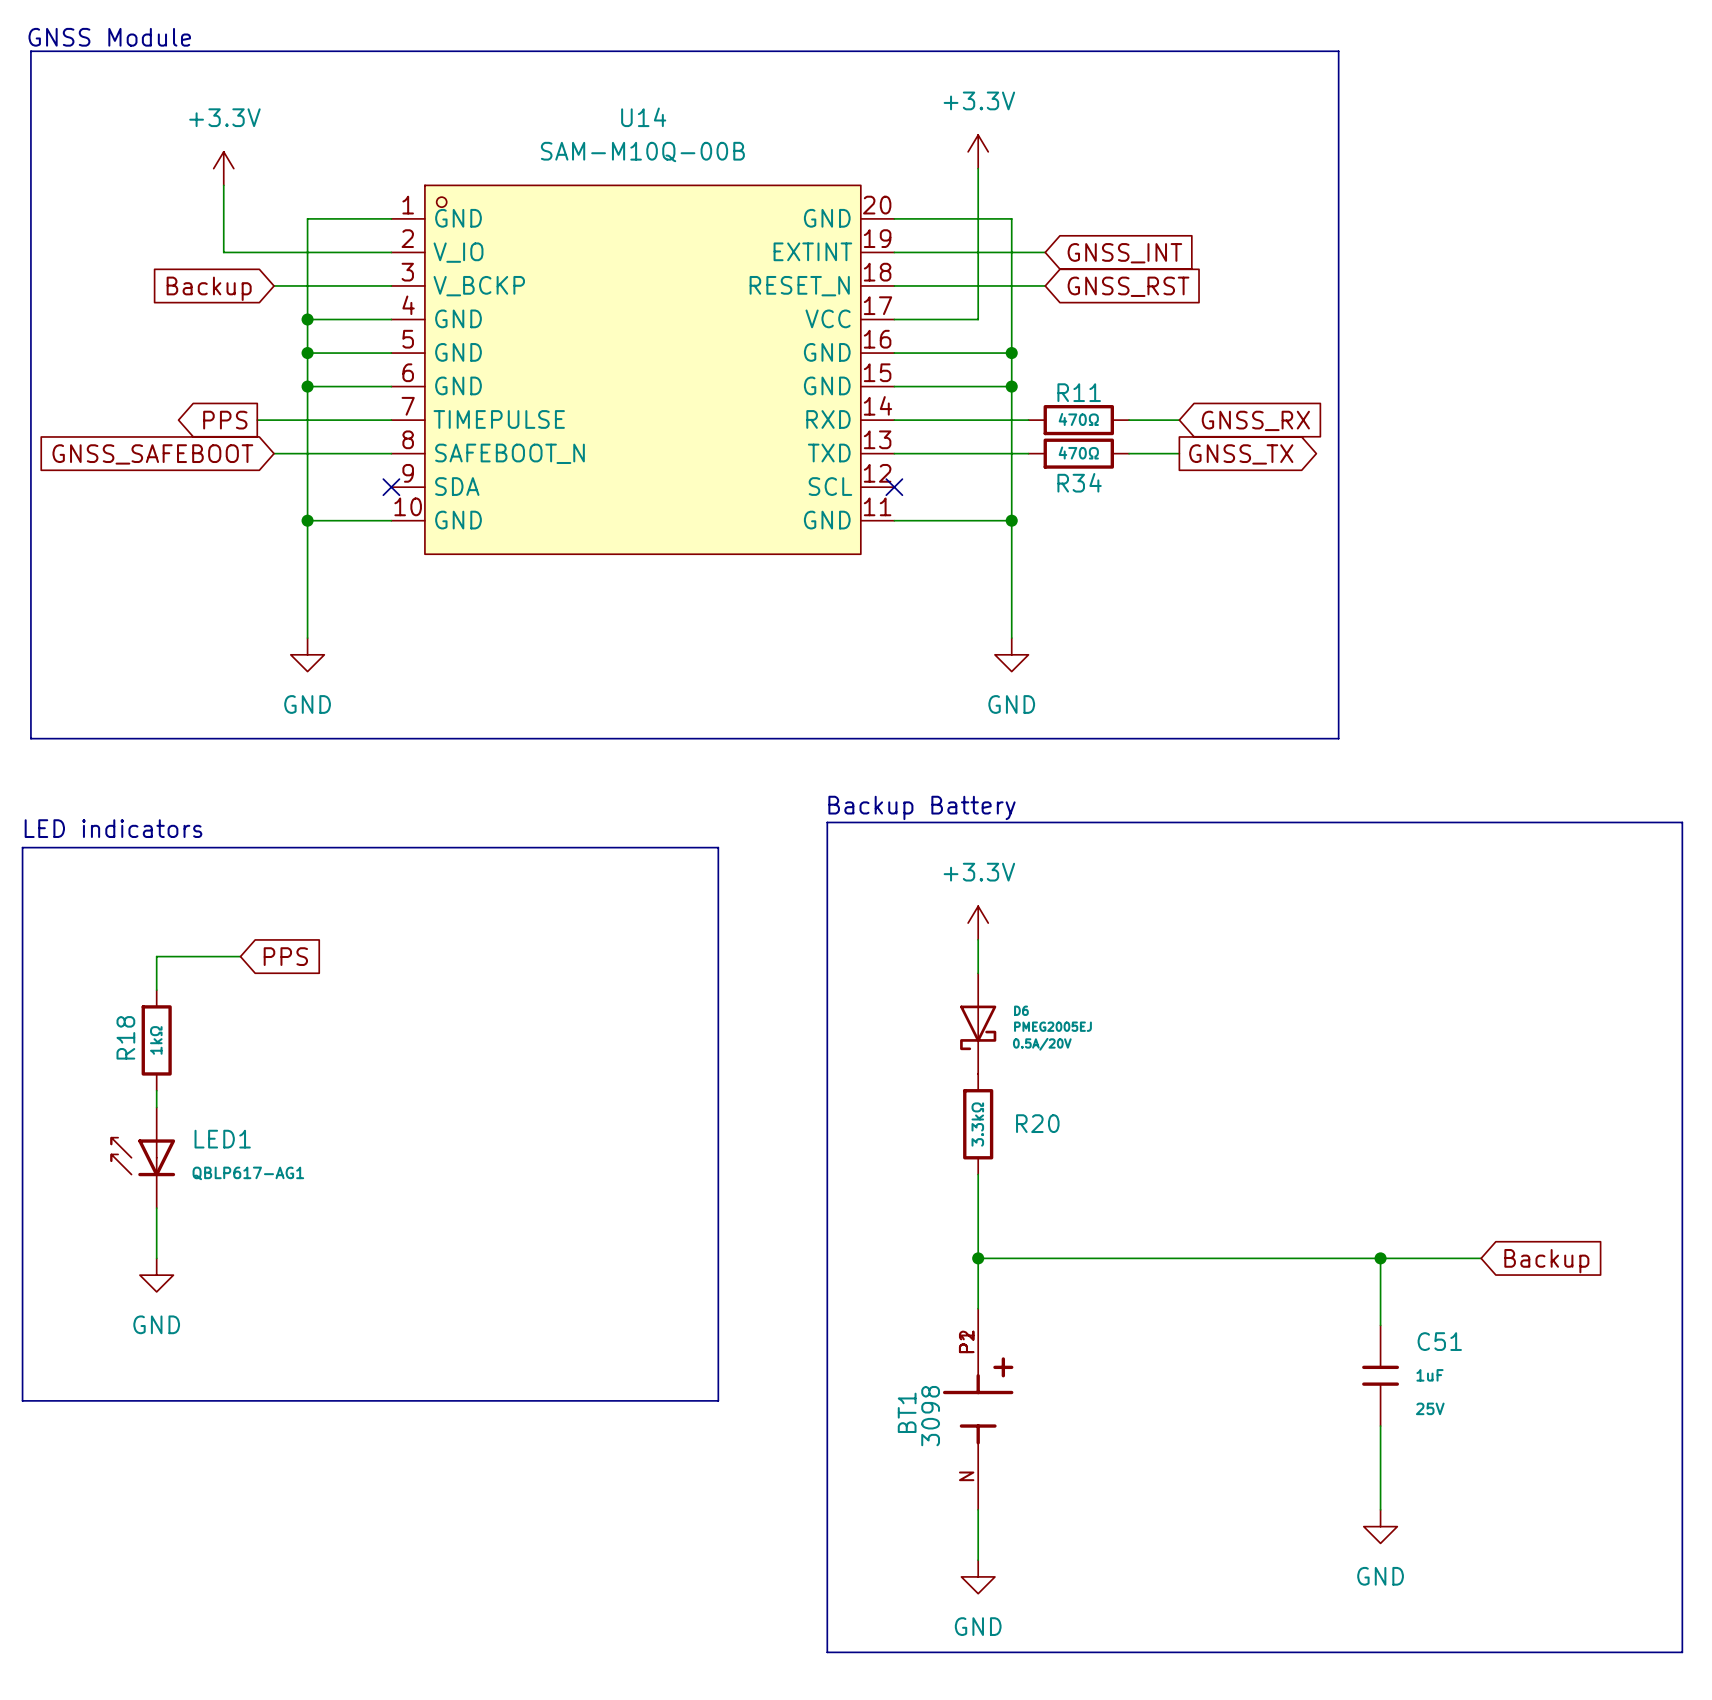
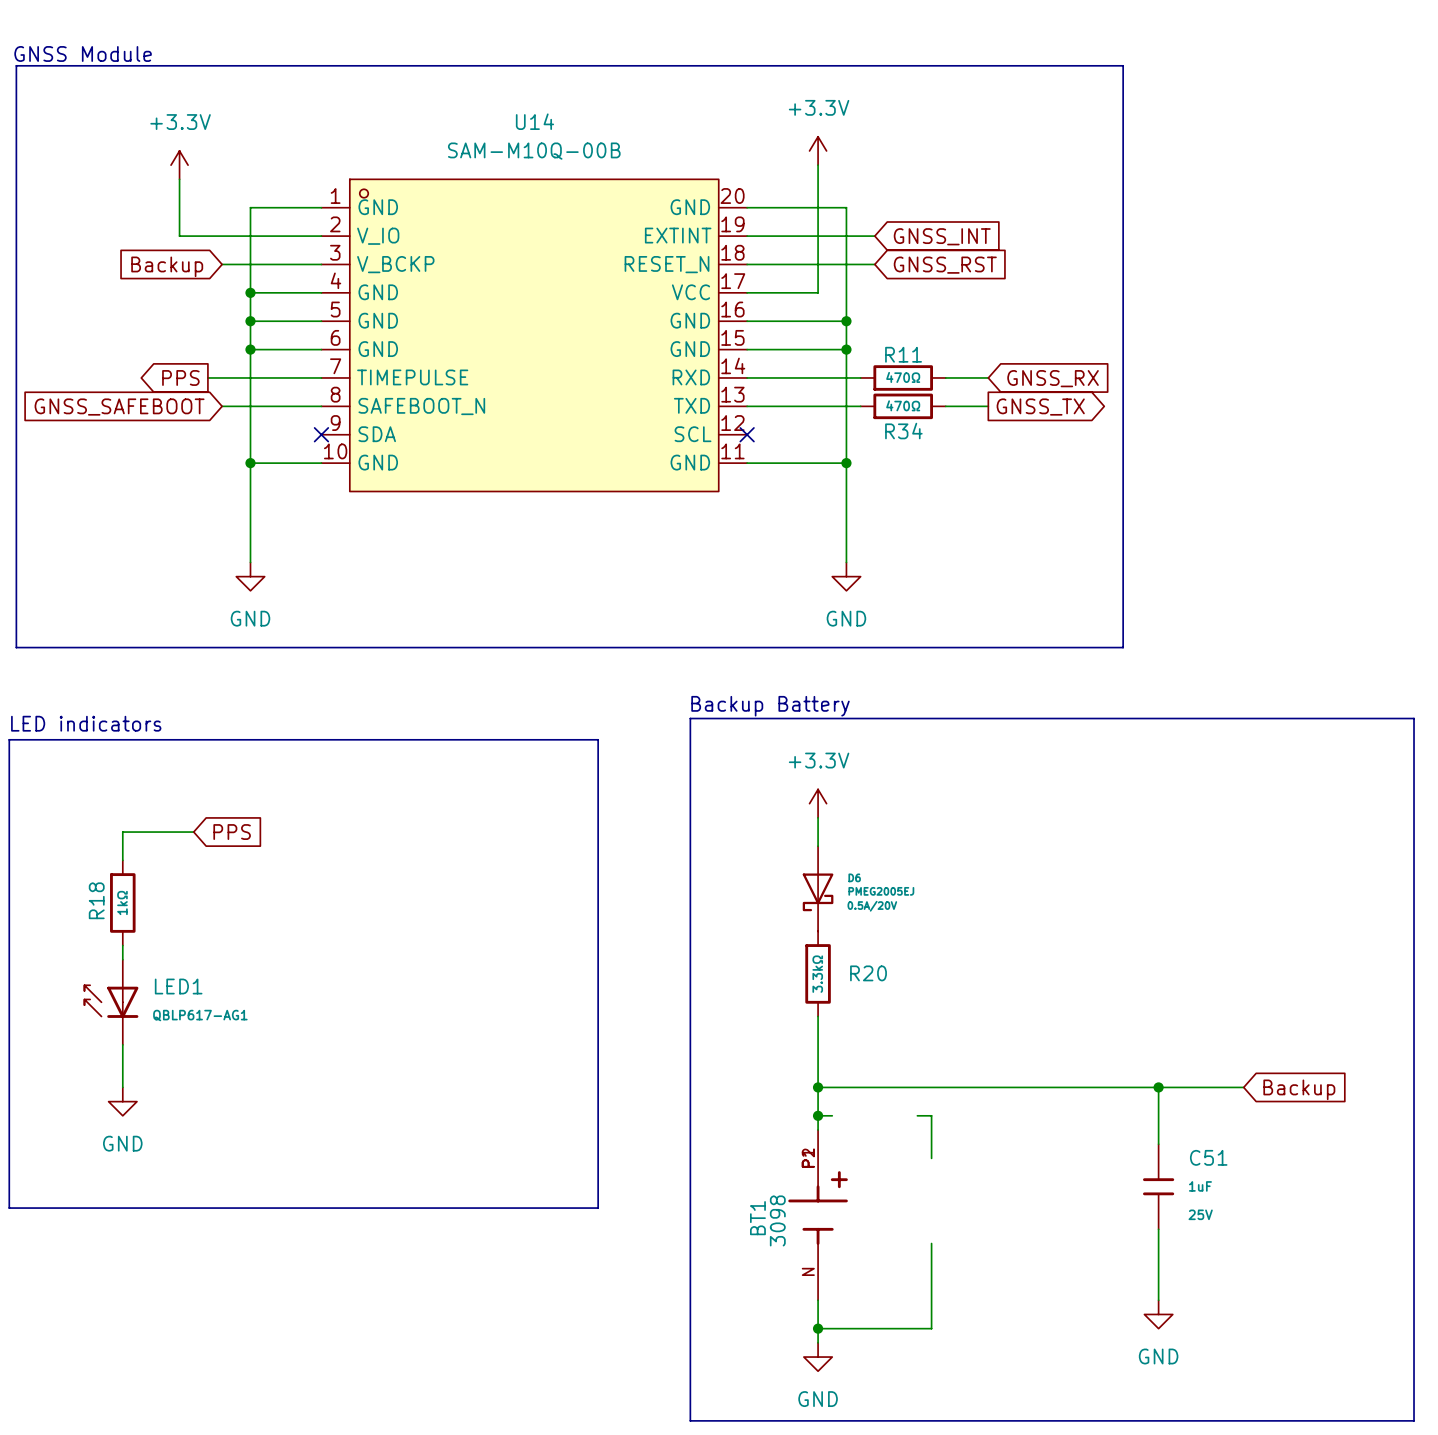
wire: none -> (818, 1115) (832, 1115)
junction: none -> (818, 1115)
wire: none -> (917, 1115) (931, 1115) (931, 1158)
wire: none -> (931, 1243) (931, 1328) (818, 1328)
junction: none -> (818, 1328)

